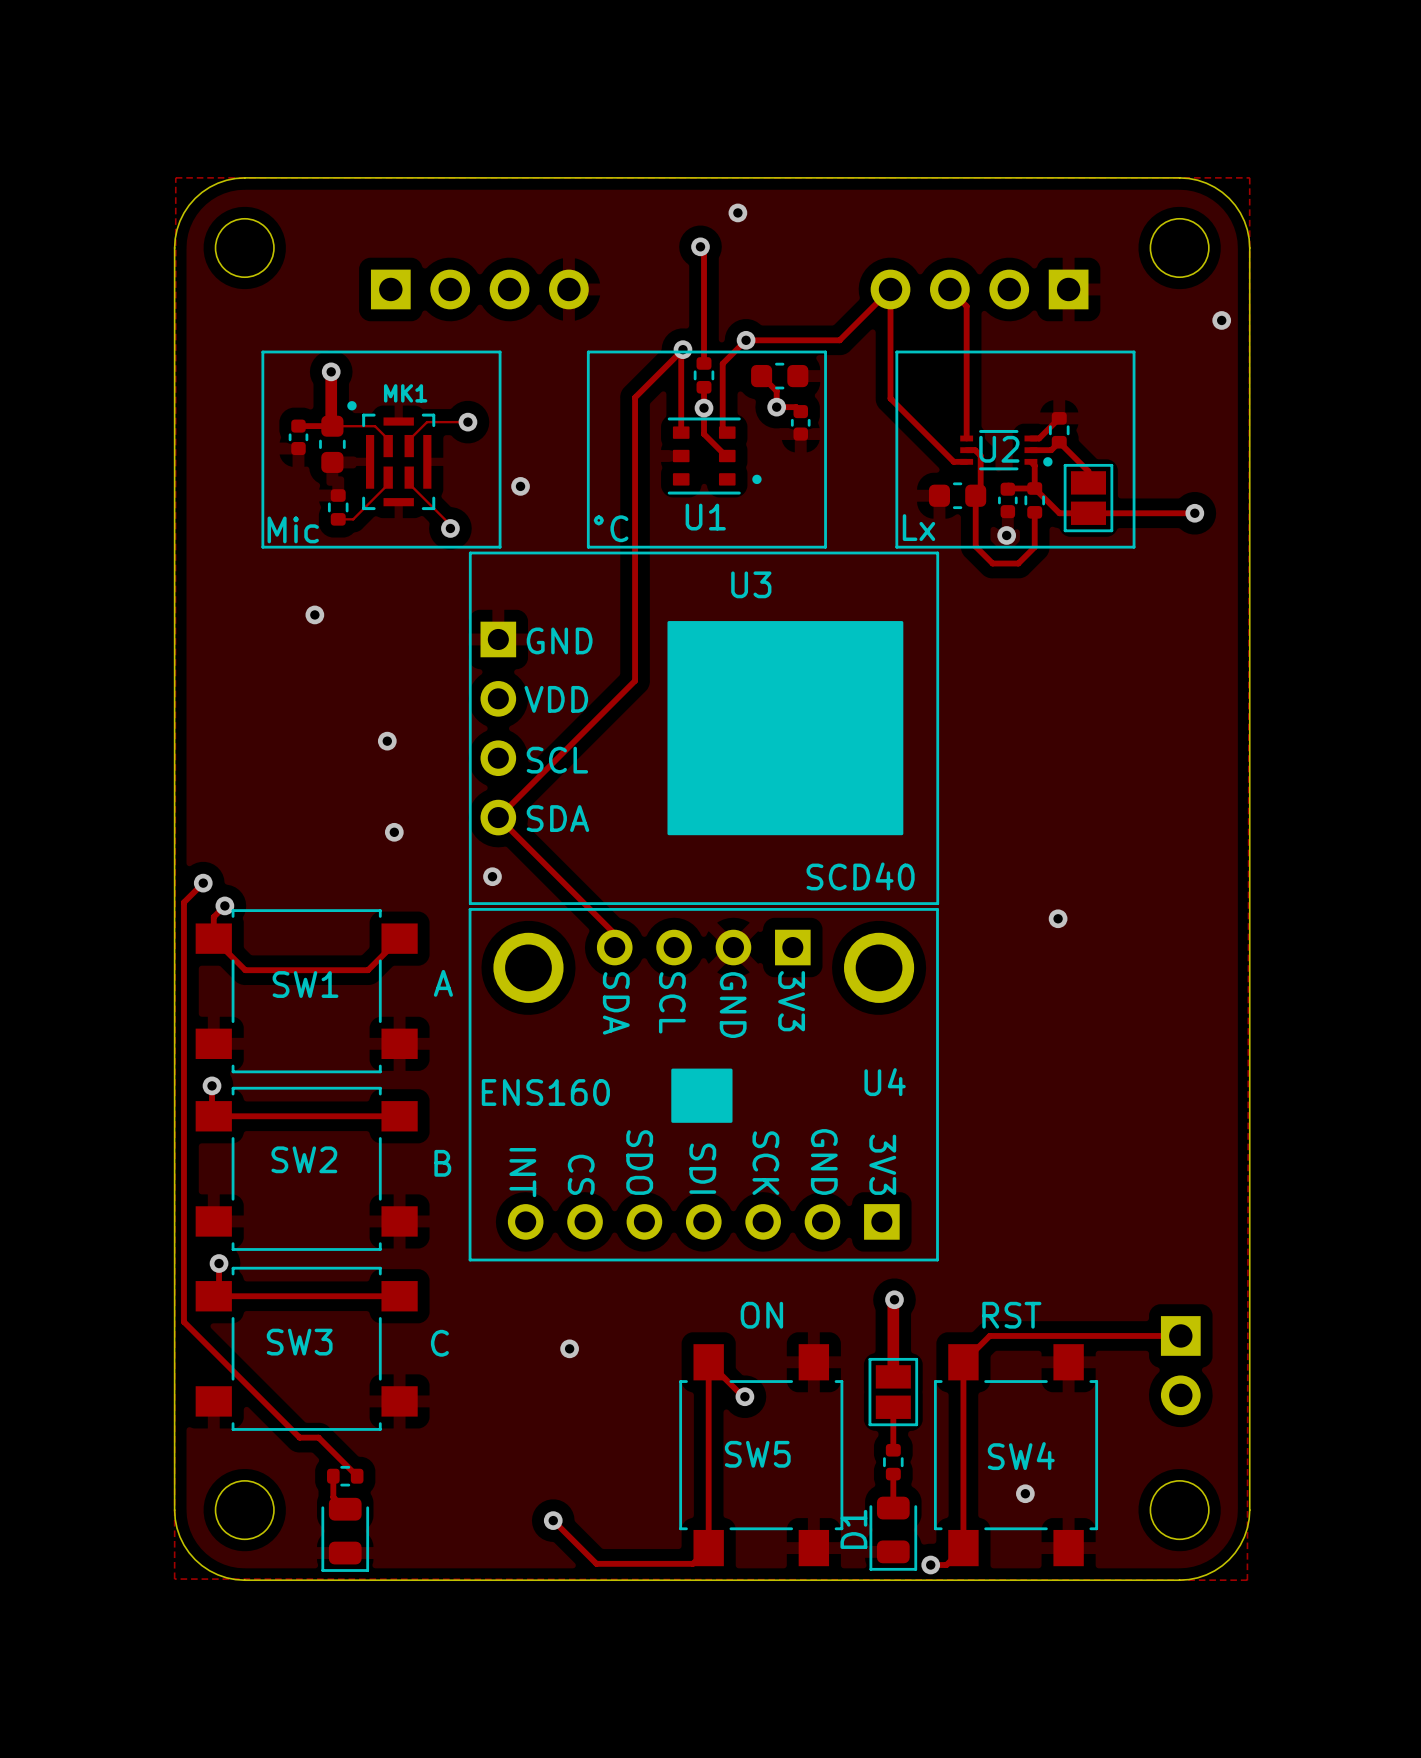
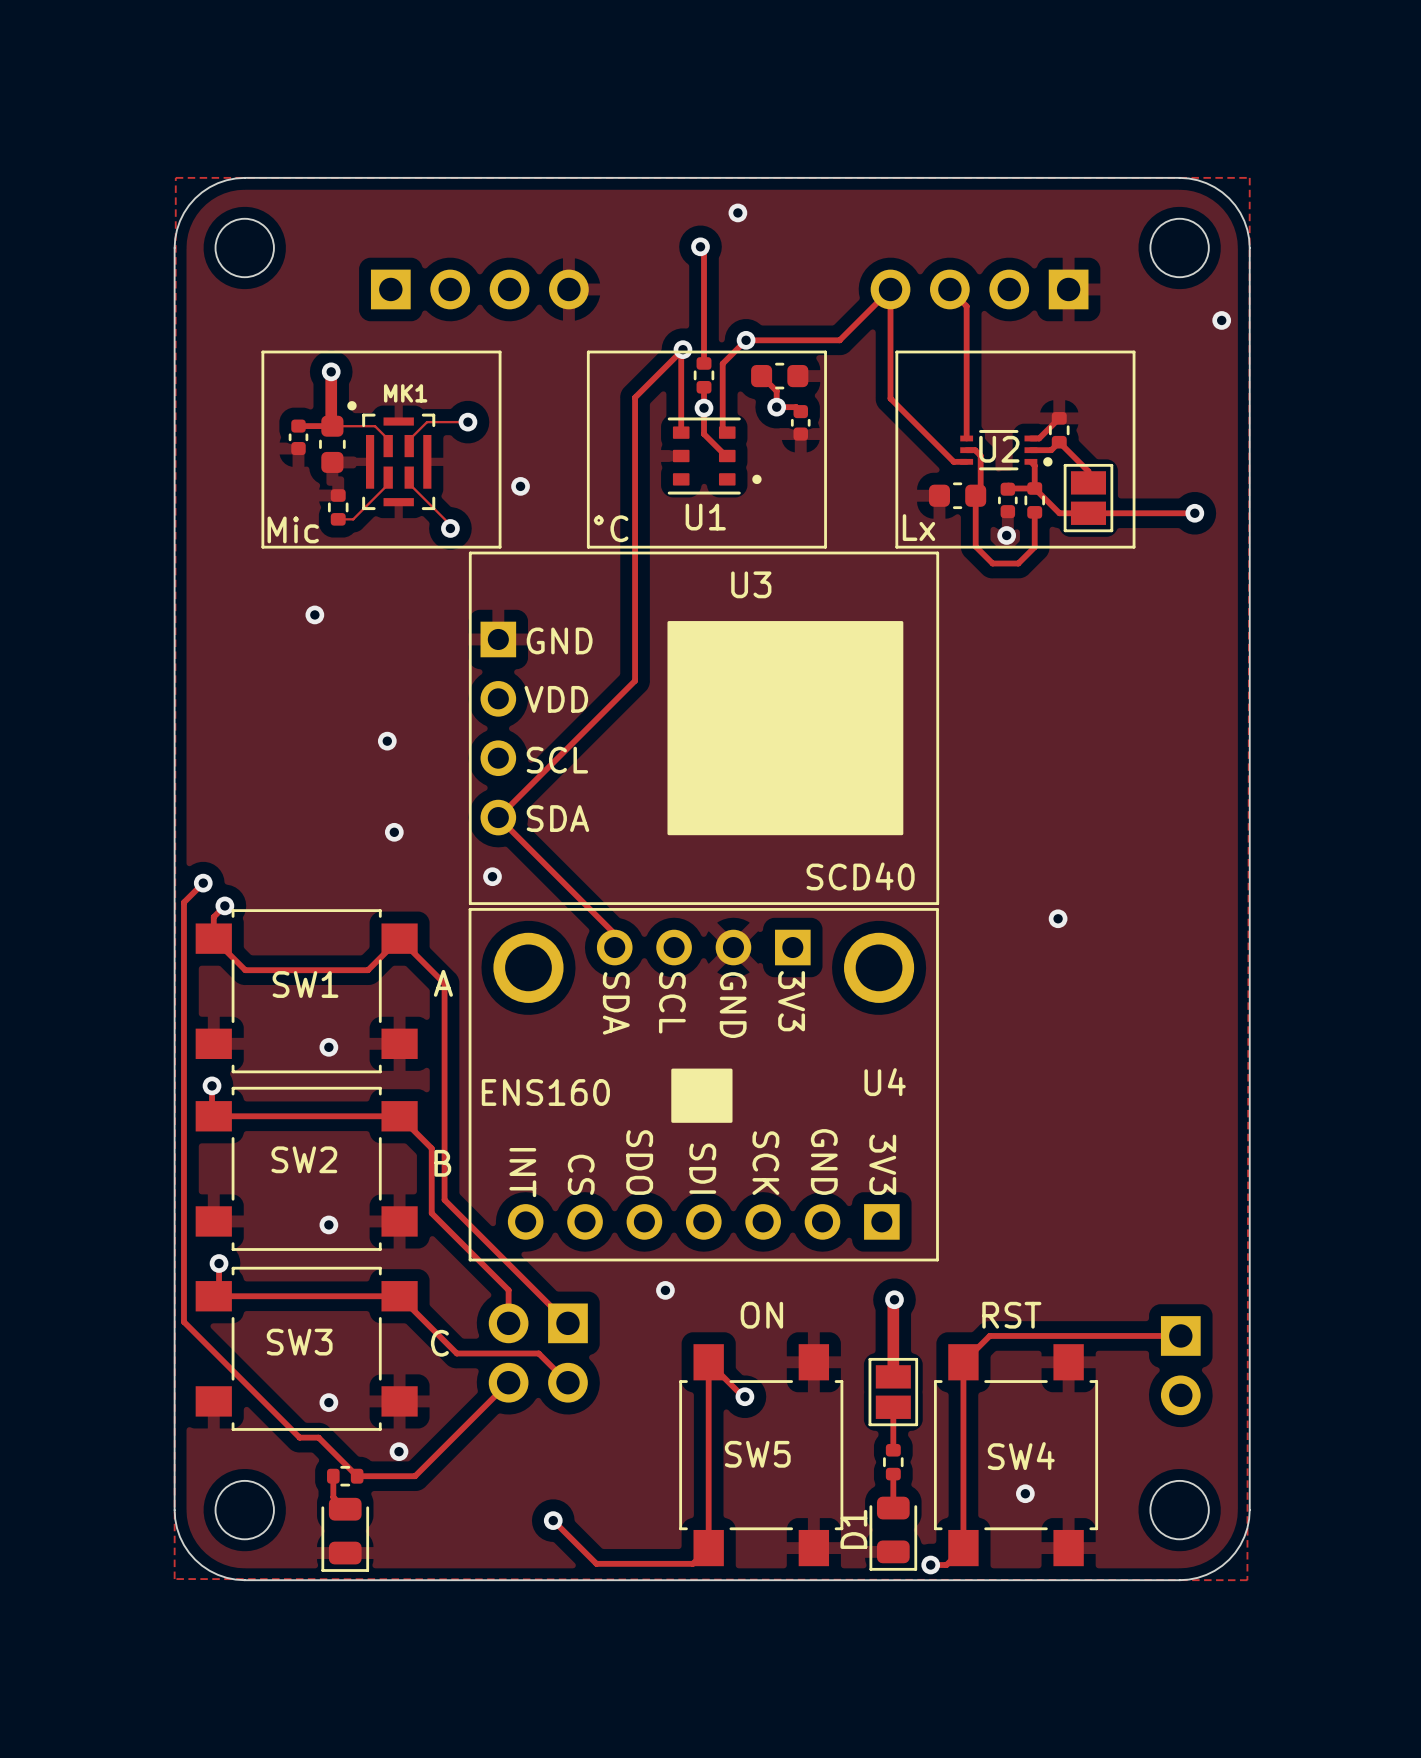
track: none -> (399, 938) (444, 983) (444, 1199) (567, 1323)
via: none -> (328, 1047)
track: none -> (399, 1116) (431, 1148) (431, 1213) (508, 1290) (508, 1323)
via: none -> (328, 1224)
via: none -> (665, 1290)
track: none -> (399, 1296) (456, 1353) (538, 1353) (567, 1382)
via: (569, 1348) -> none
part: none -> (538, 1353)
track: none -> (508, 1382) (415, 1476) (357, 1476)
via: none -> (328, 1402)
via: none -> (399, 1451)

